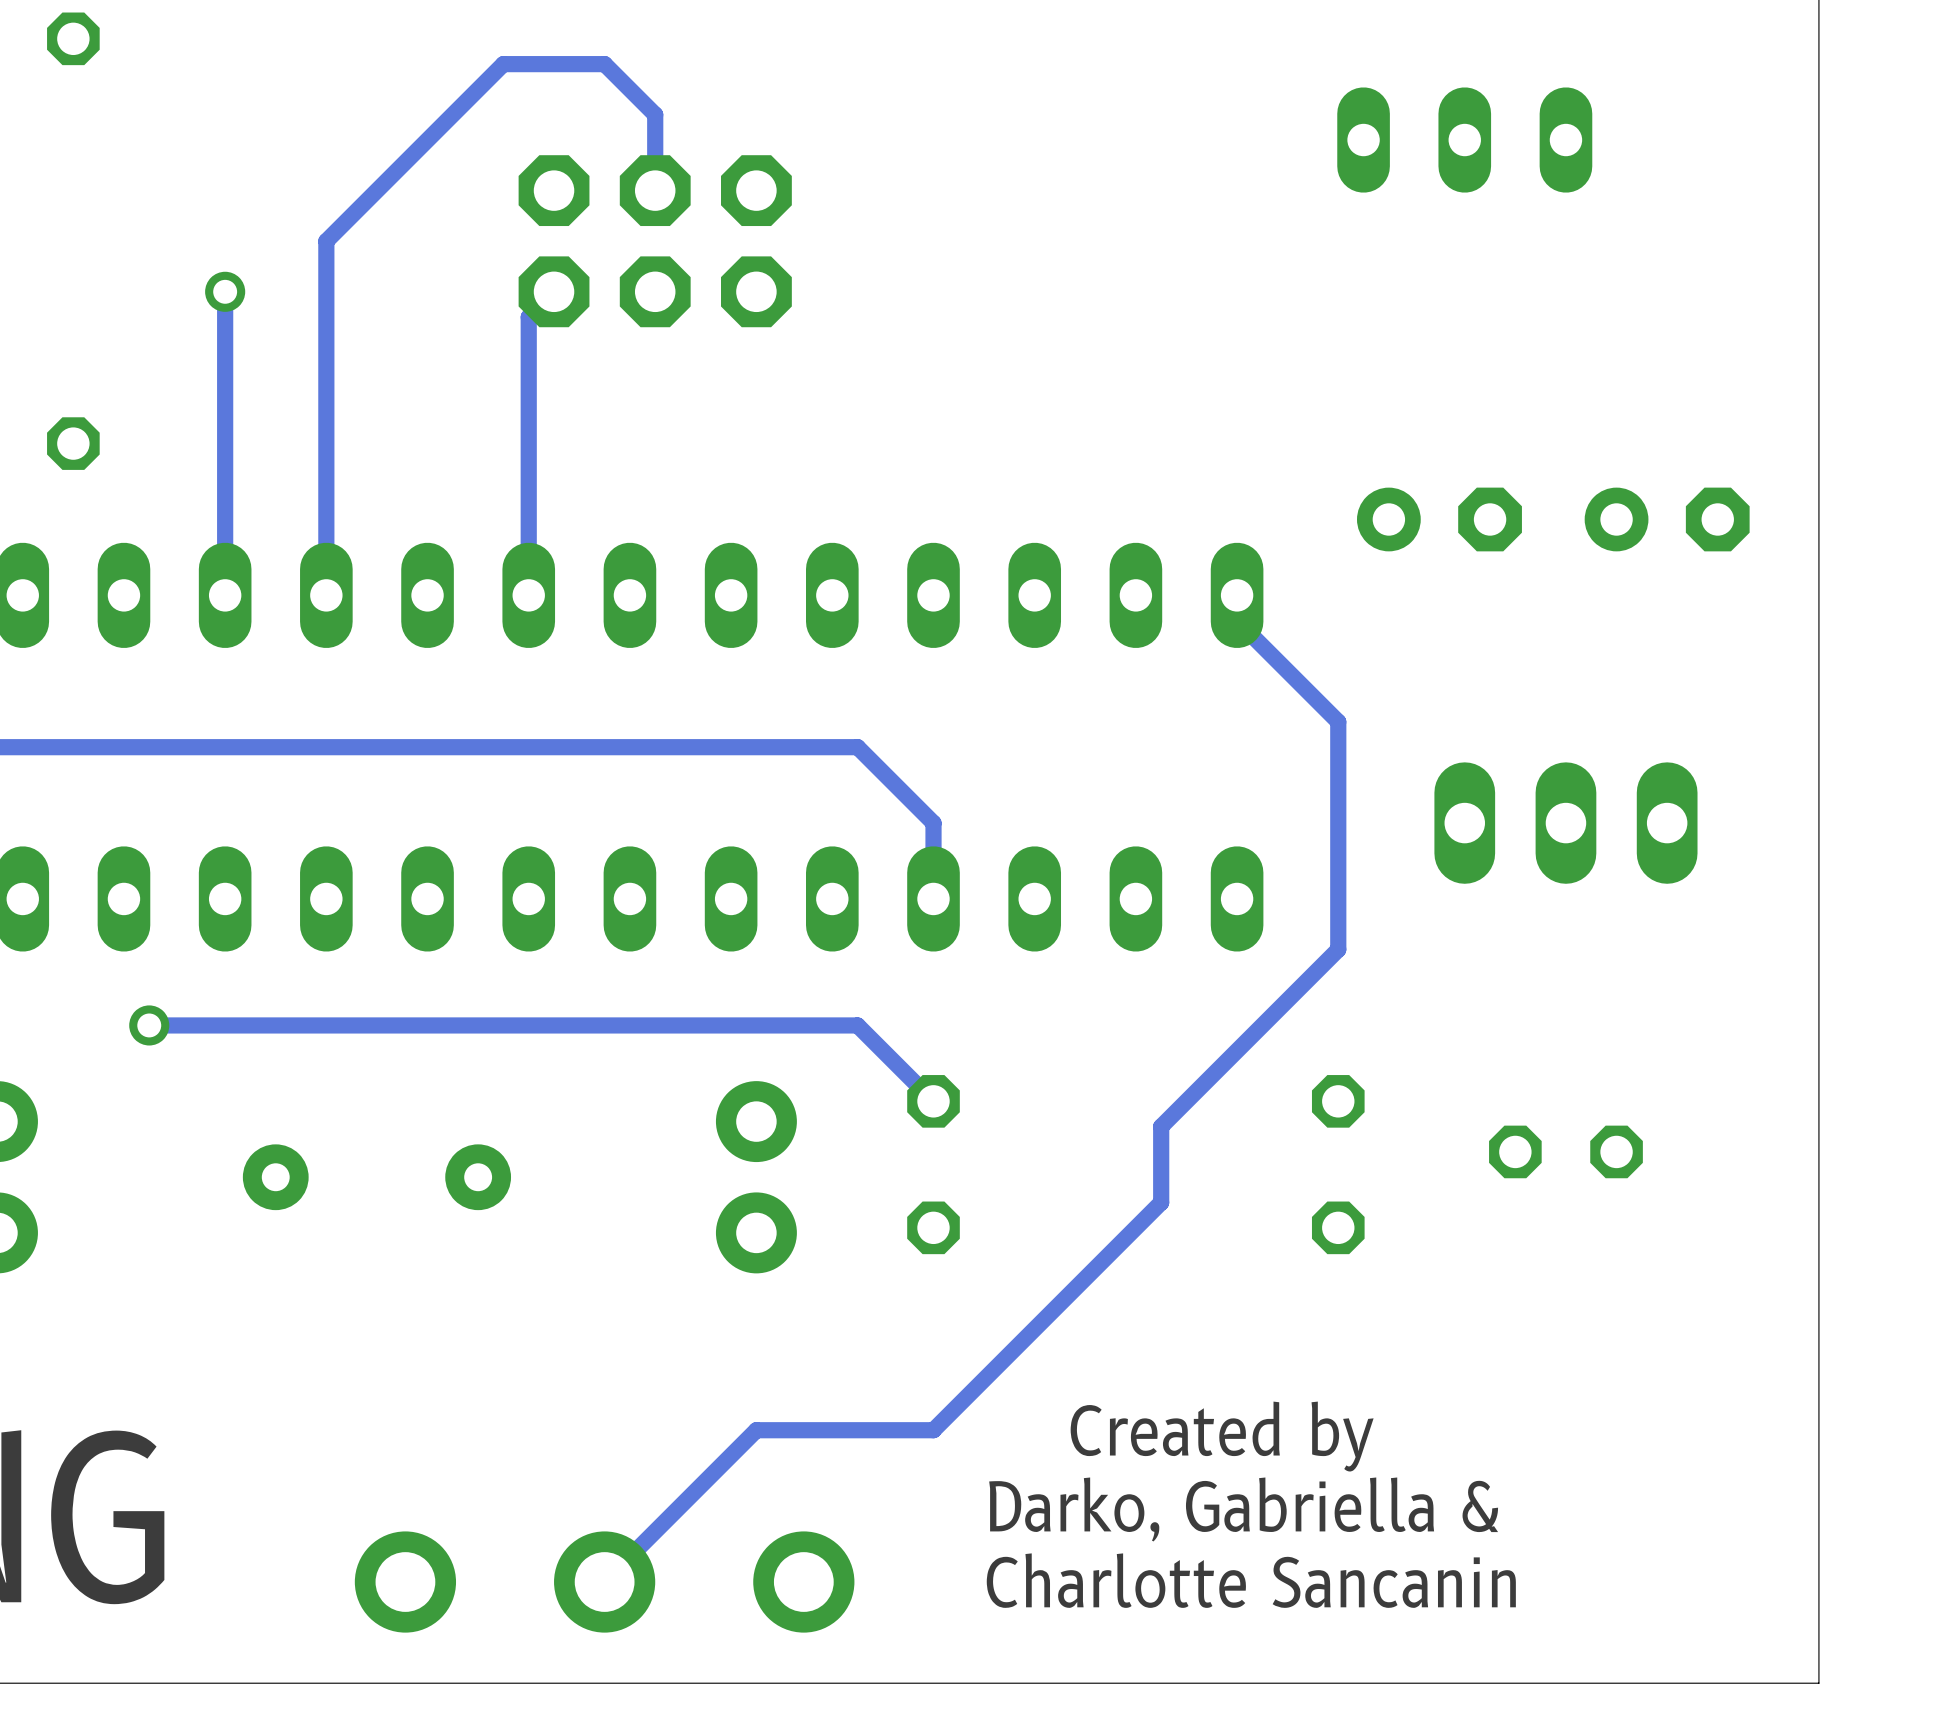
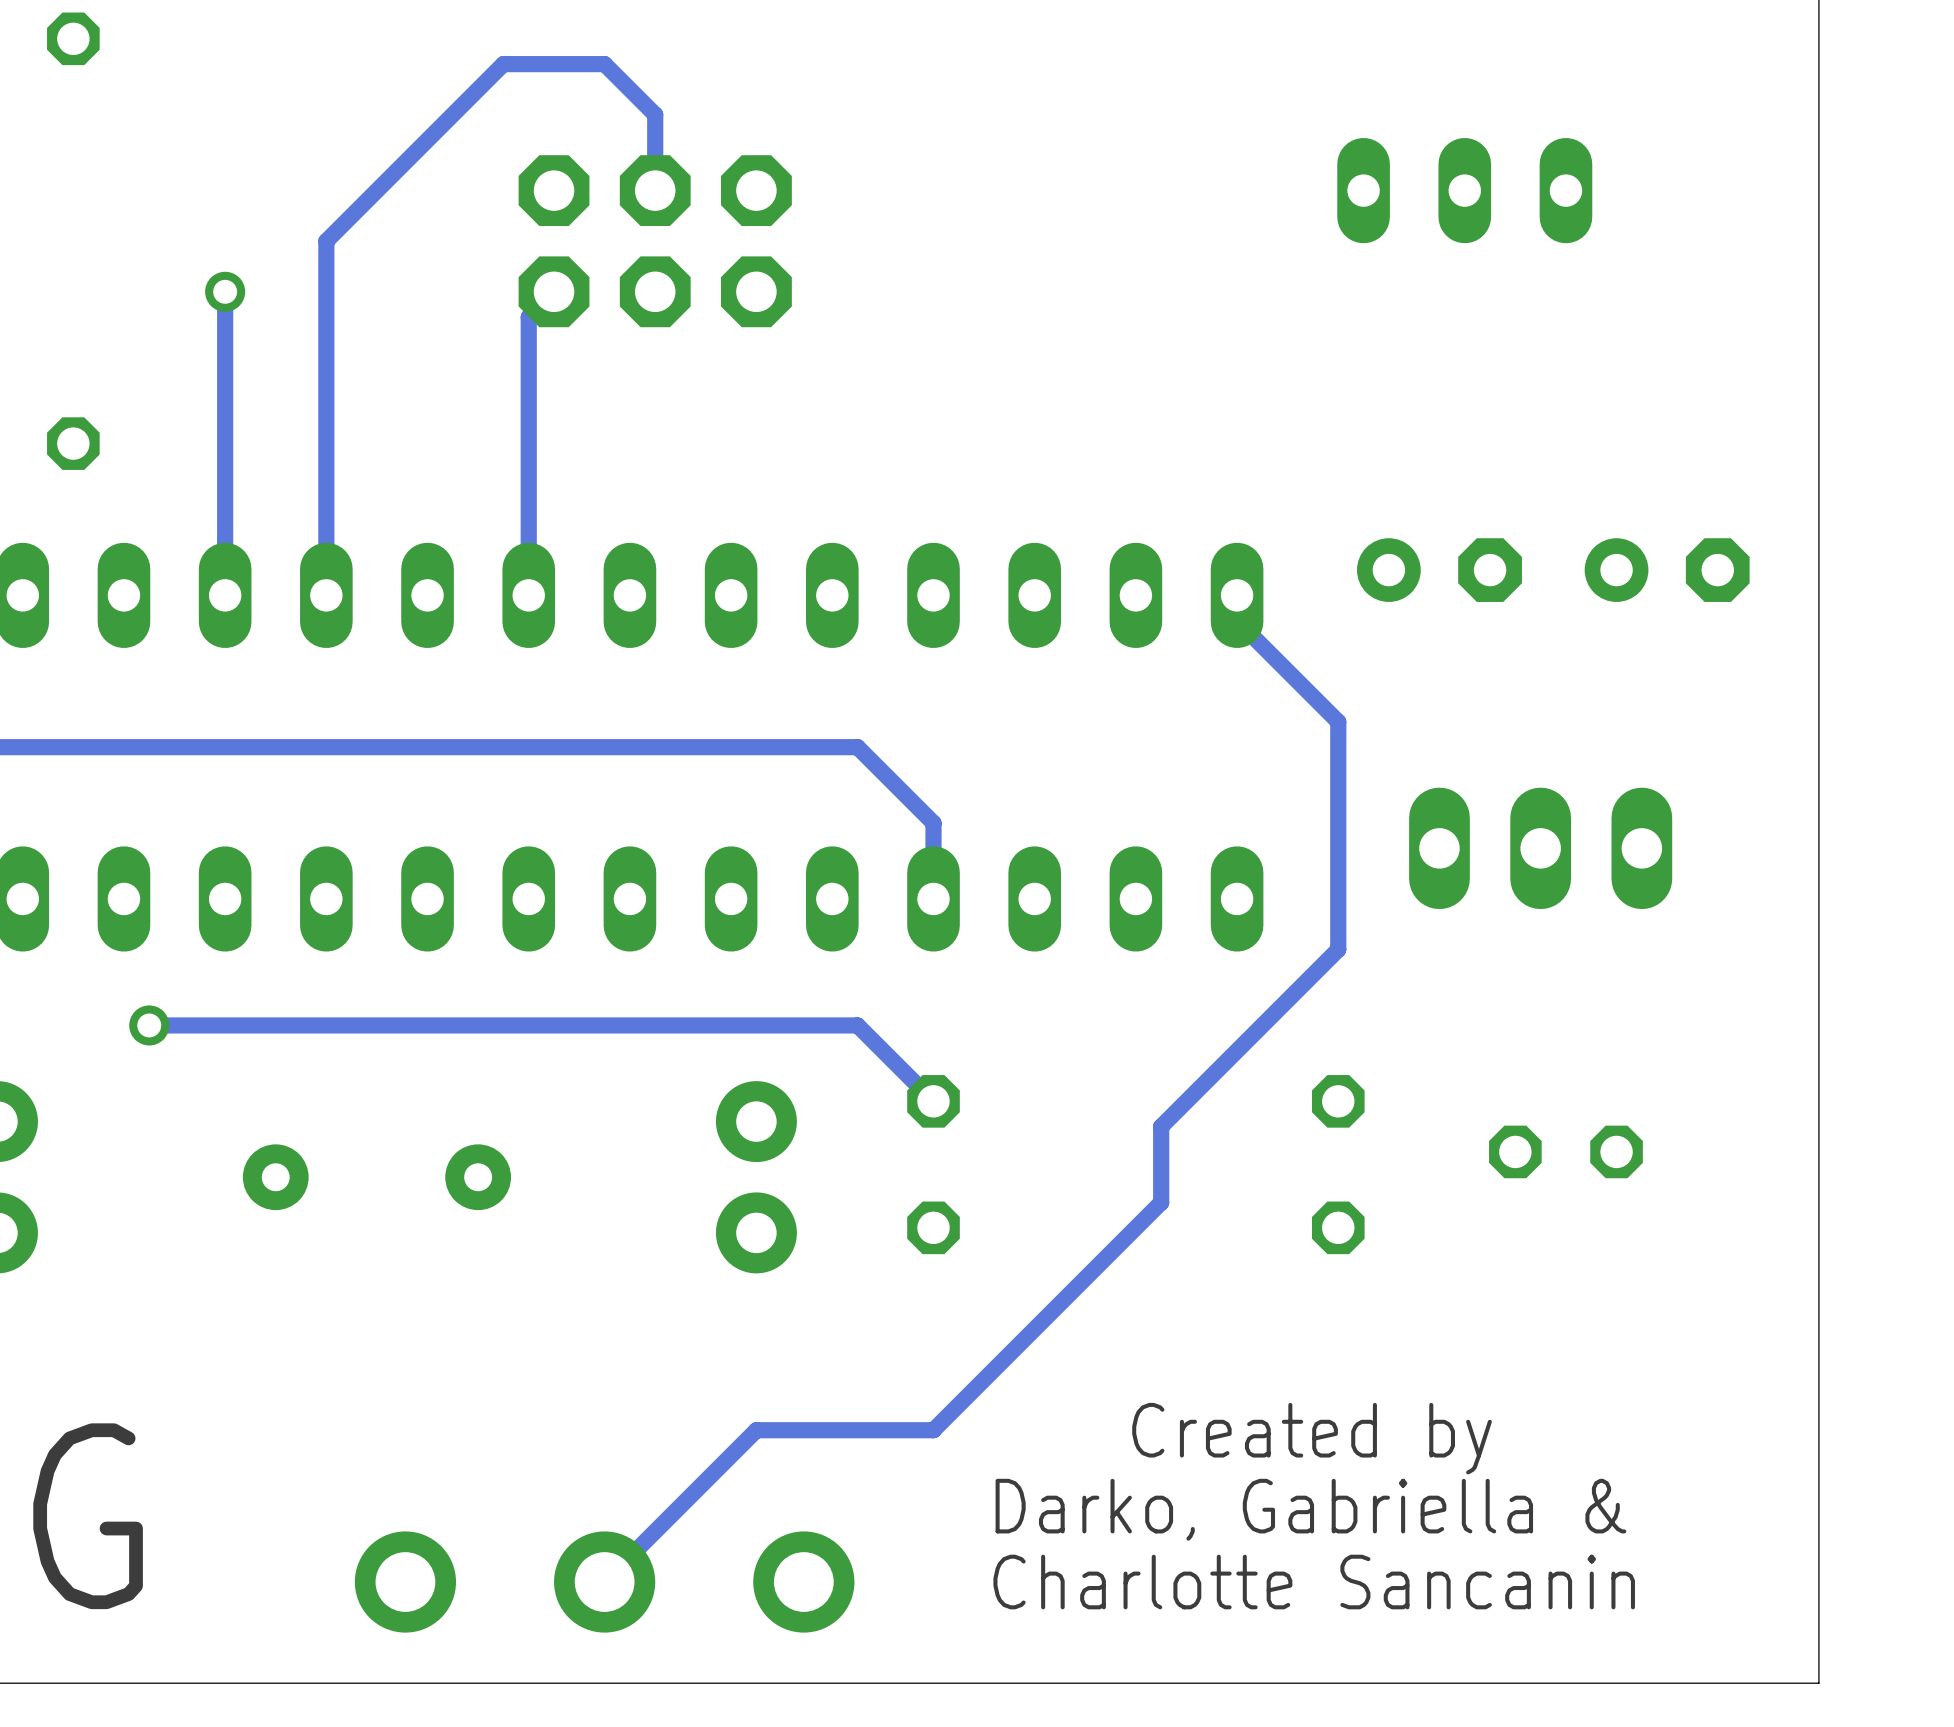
part position: (1464, 140) -> (1464, 190)
part position: (1439, 519) -> (1439, 570)
part position: (1667, 519) -> (1667, 570)
part position: (1565, 823) -> (1540, 848)

